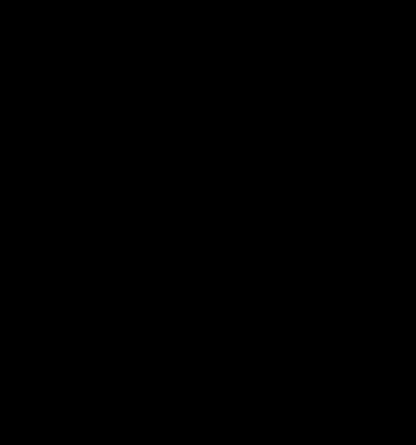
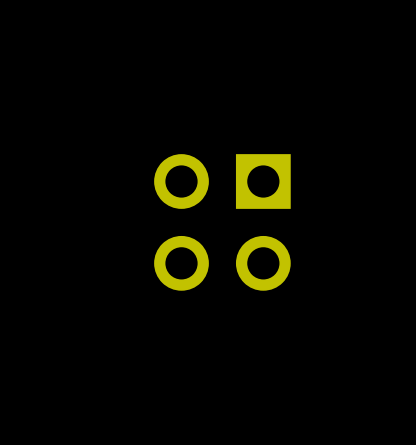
part: none -> (222, 222)

